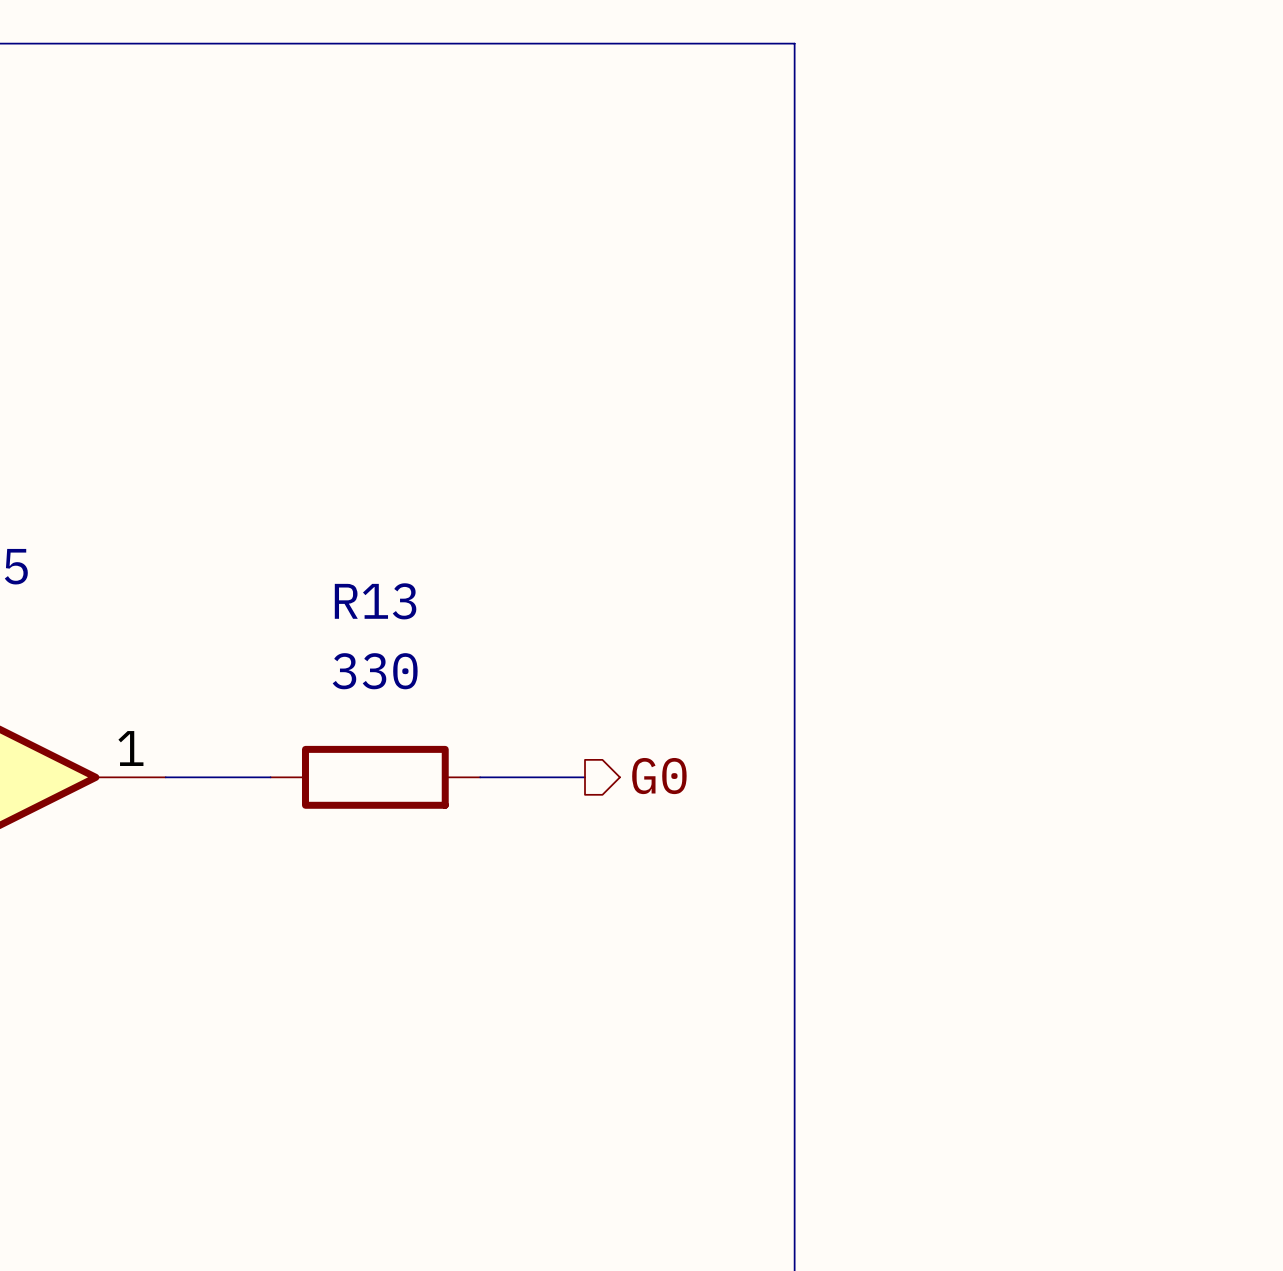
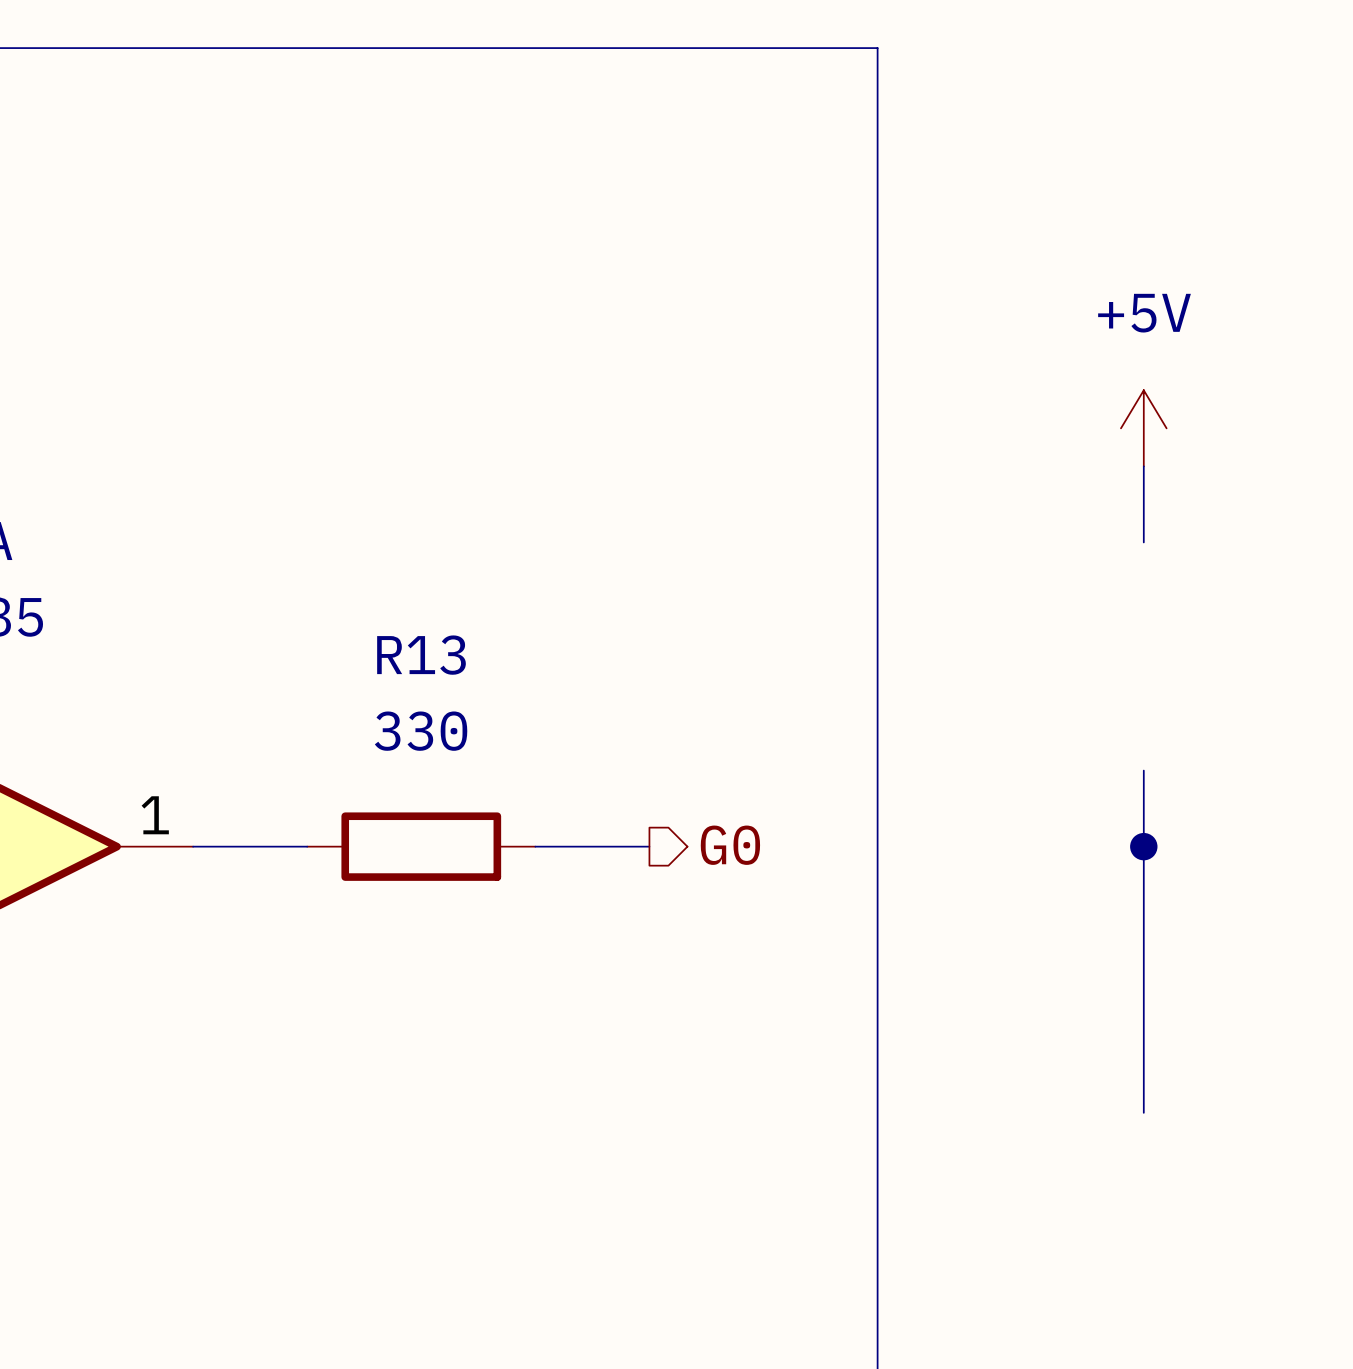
power symbol: none -> +5V (1143, 428)
wire: none -> (1143, 466) (1143, 542)
wire: none -> (1143, 770) (1143, 1112)
junction: none -> (1143, 846)

